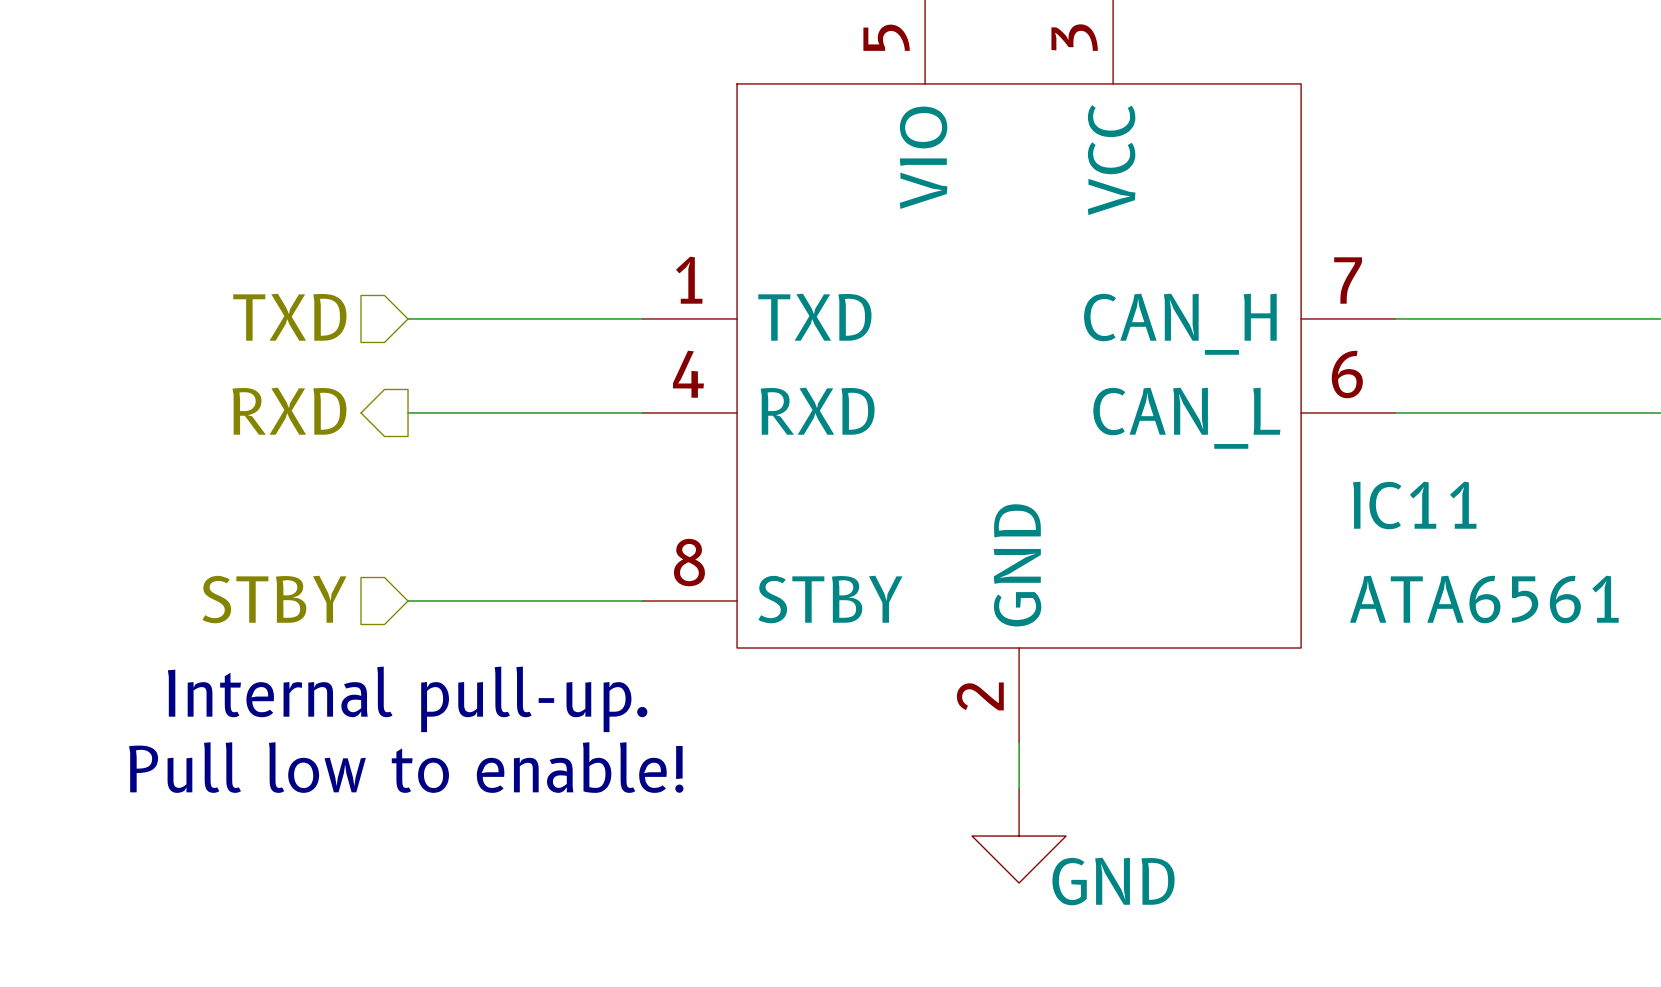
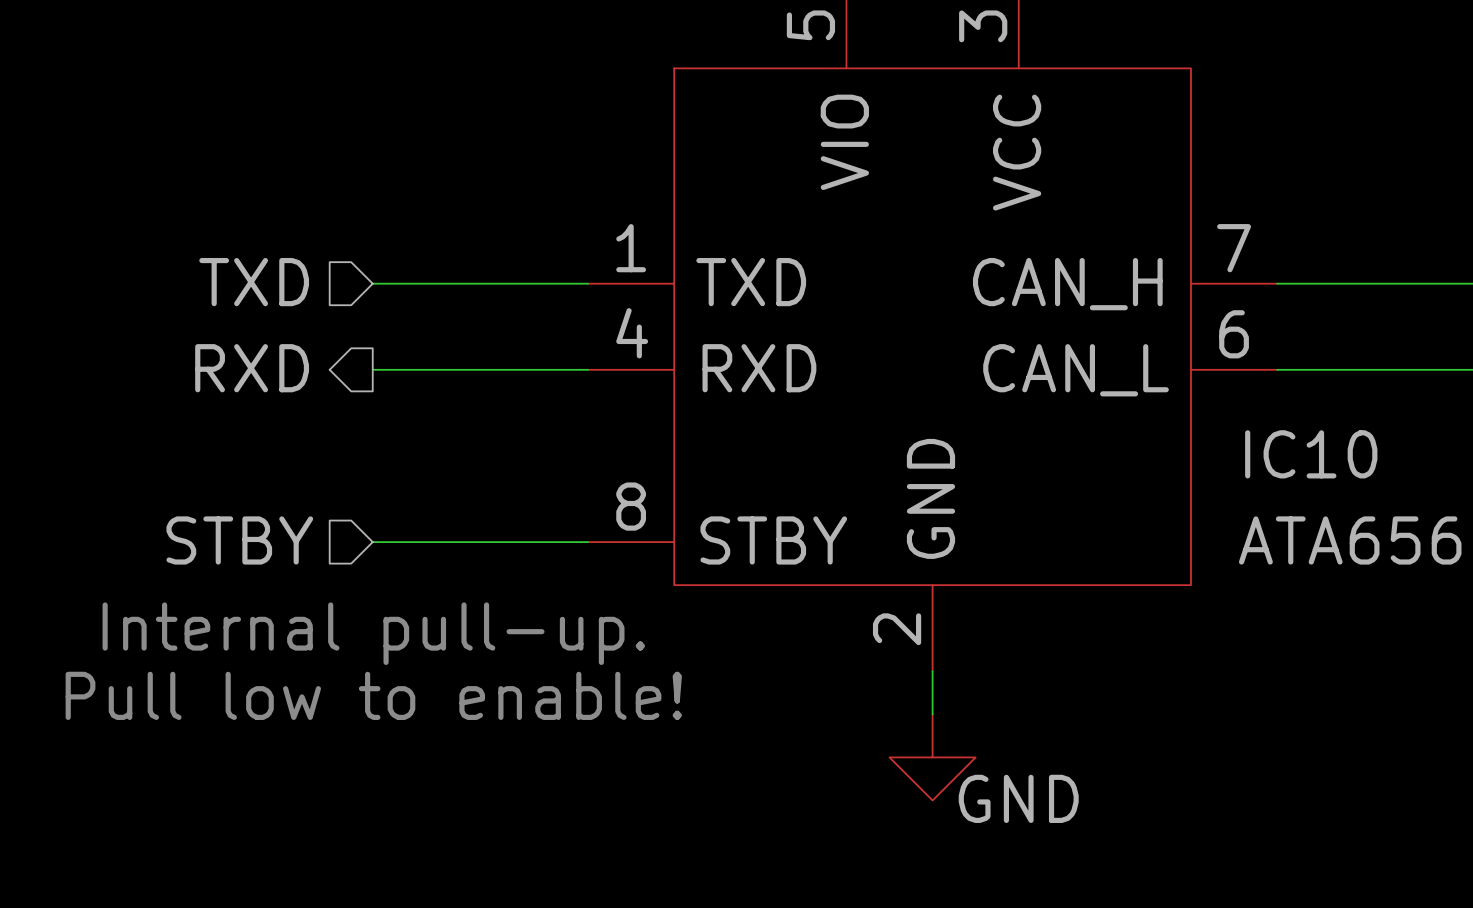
IC11 name: IC11 (1414, 505) -> IC10 (1311, 454)

